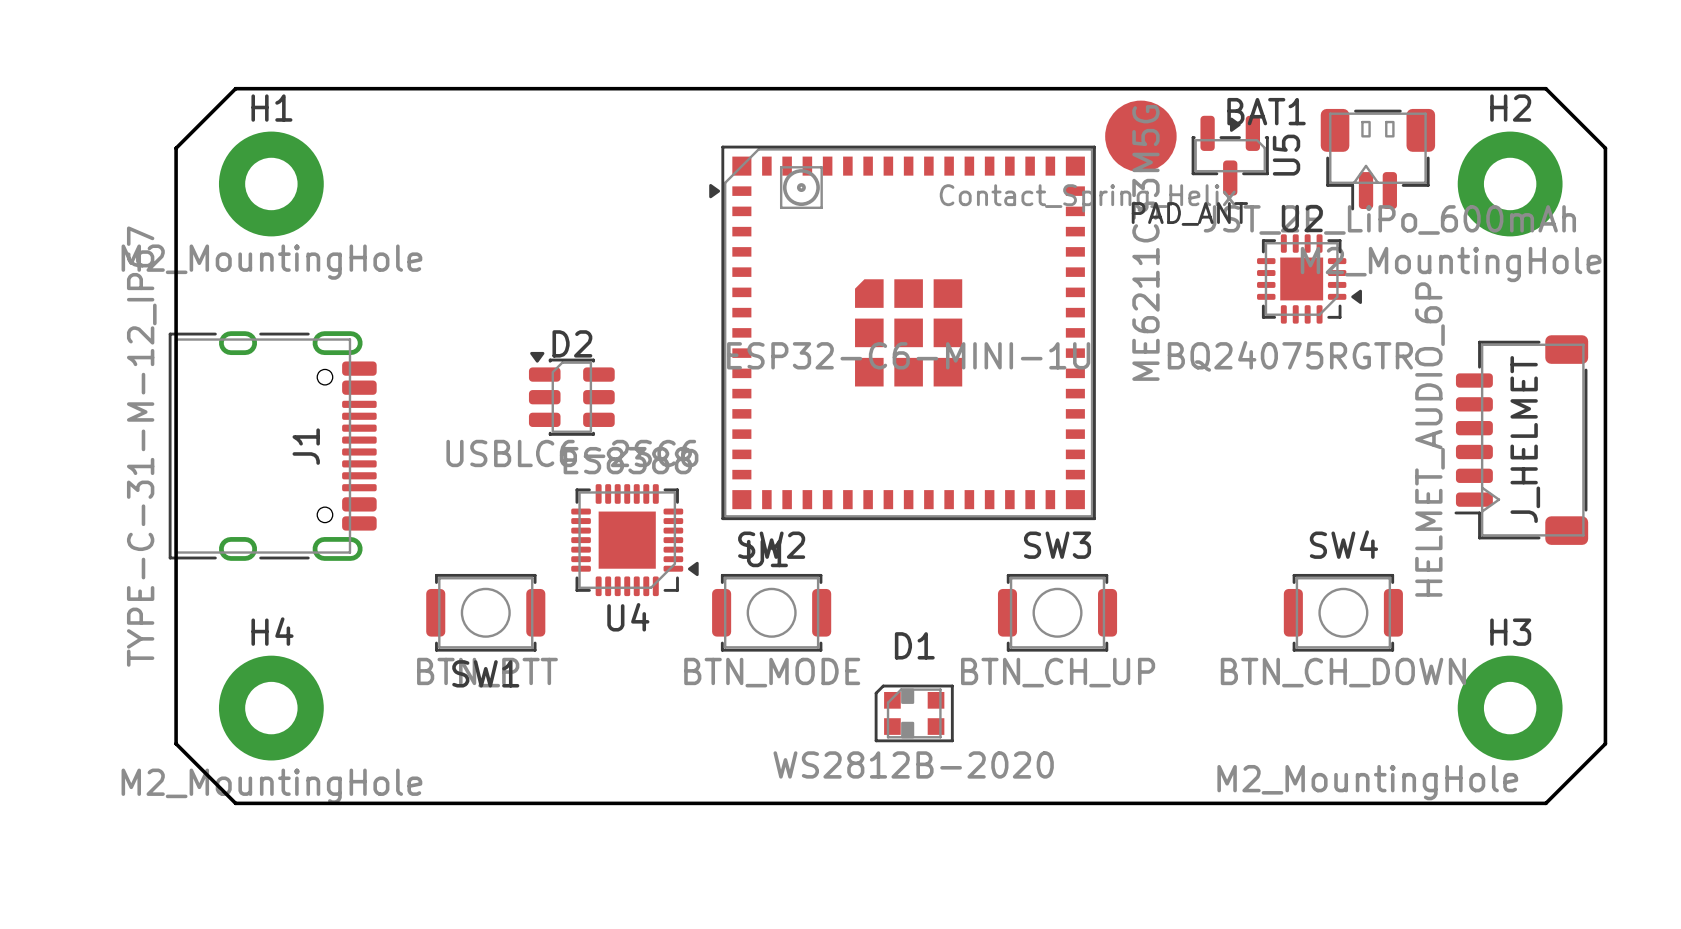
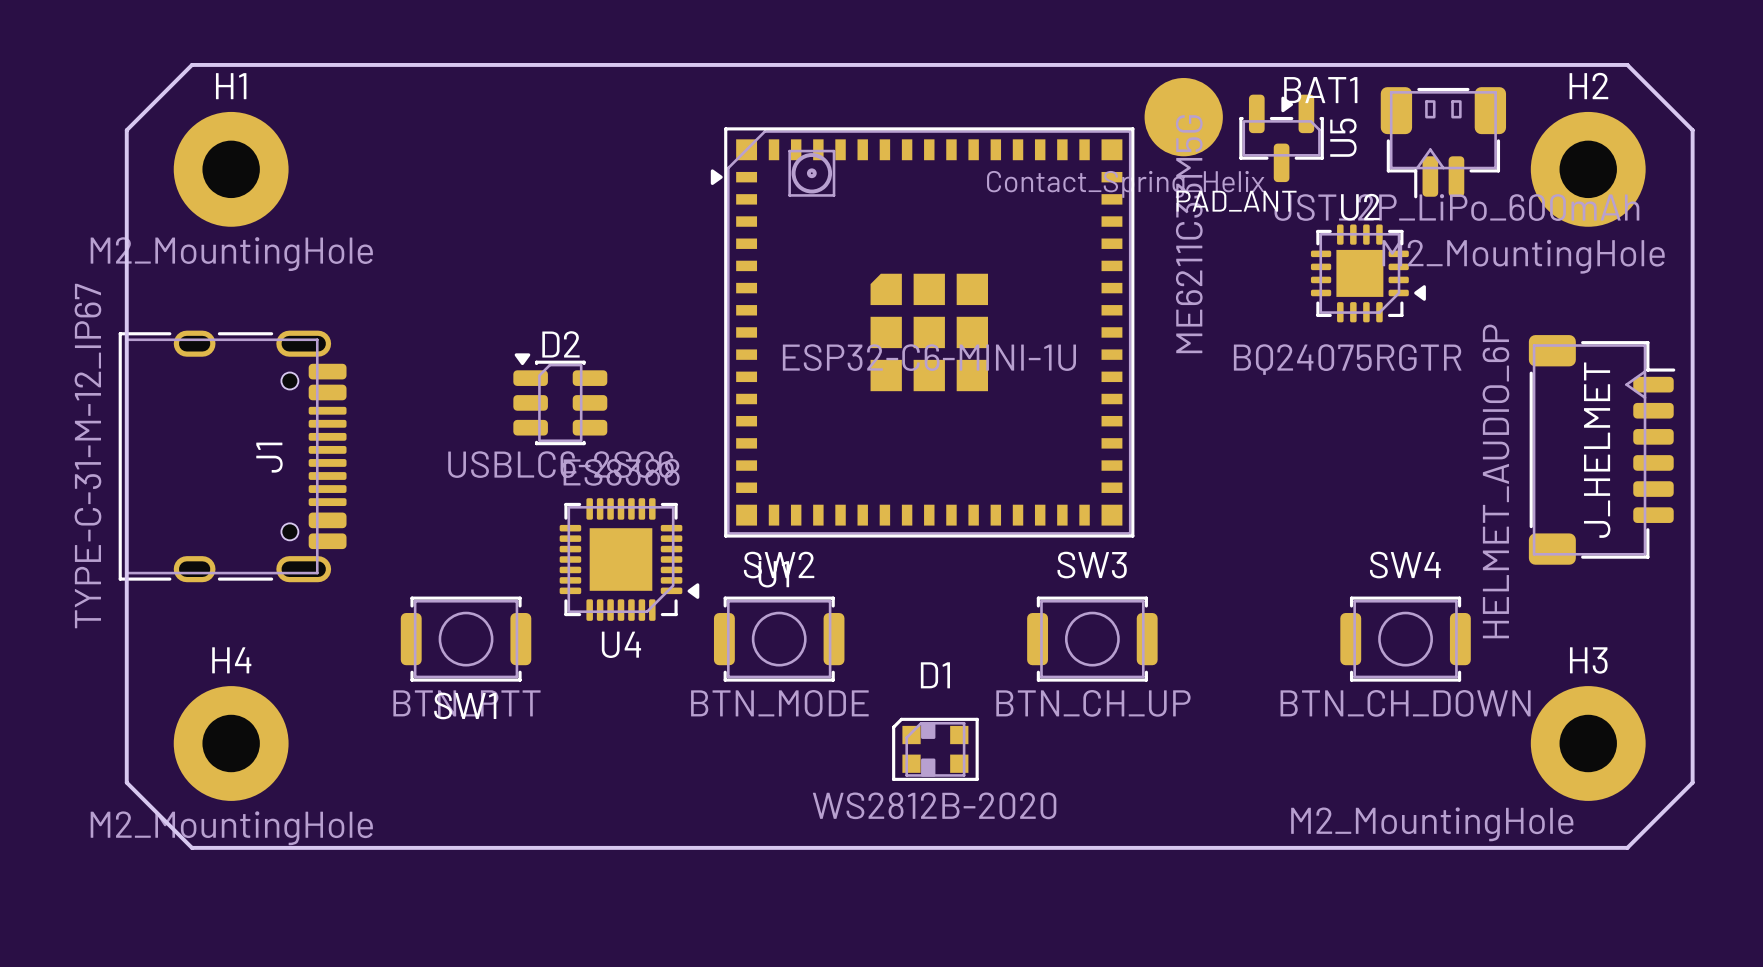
J_HELMET rotation: 0° (1521, 440) -> 180° (1602, 449)

